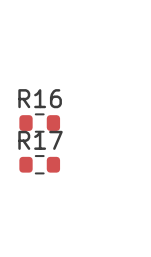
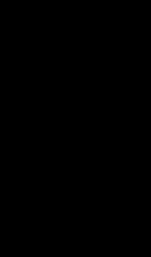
R16: (39, 123) -> none
R17: (39, 164) -> none

